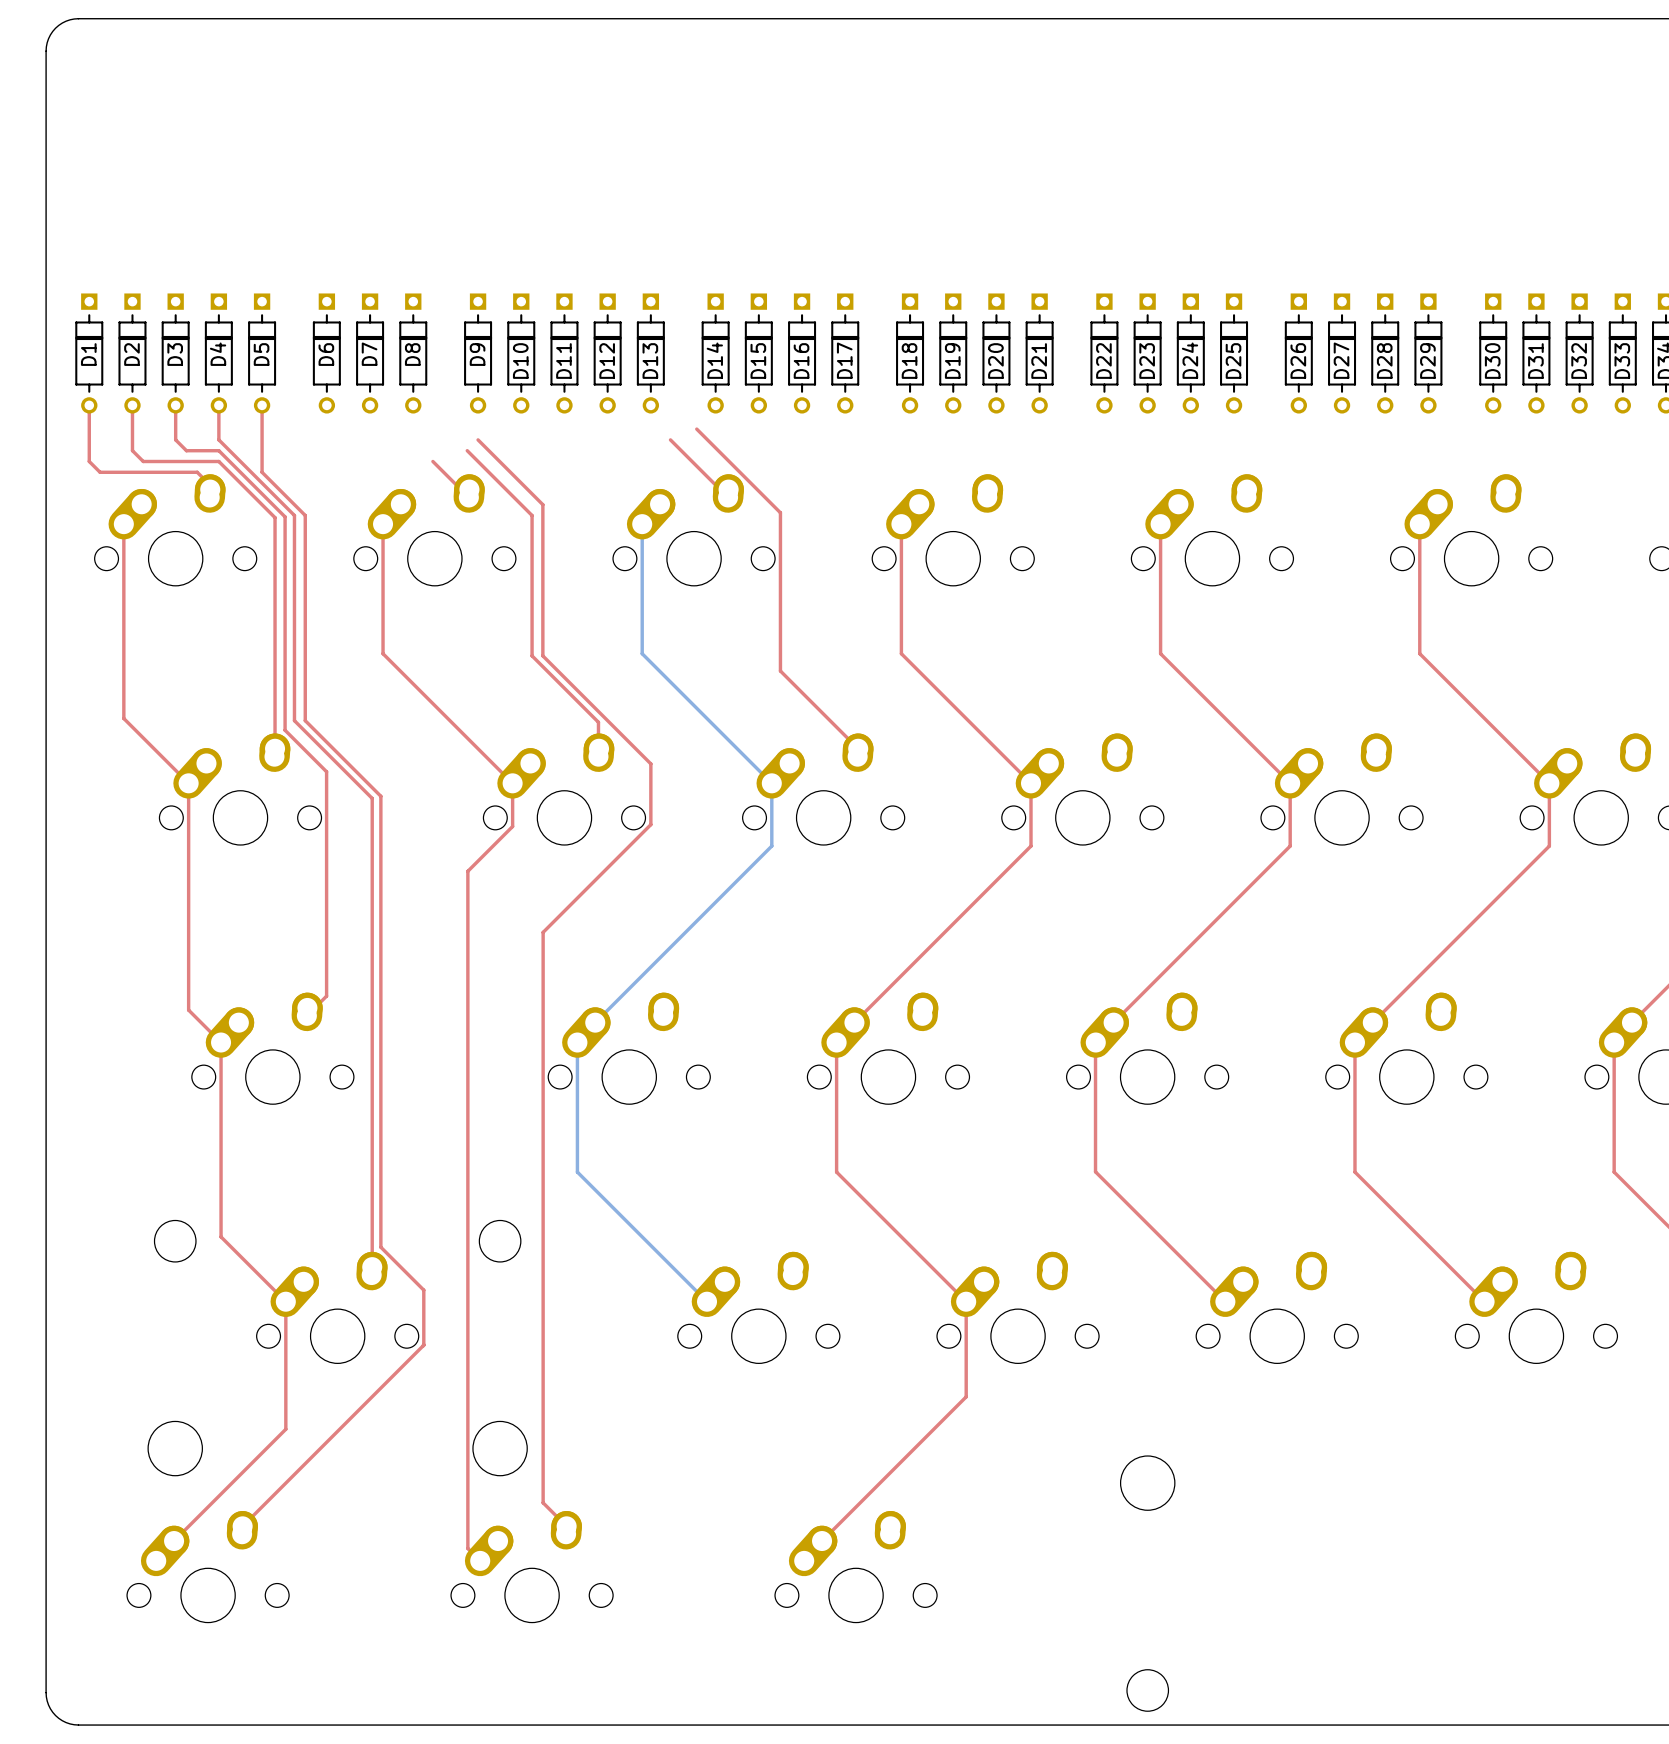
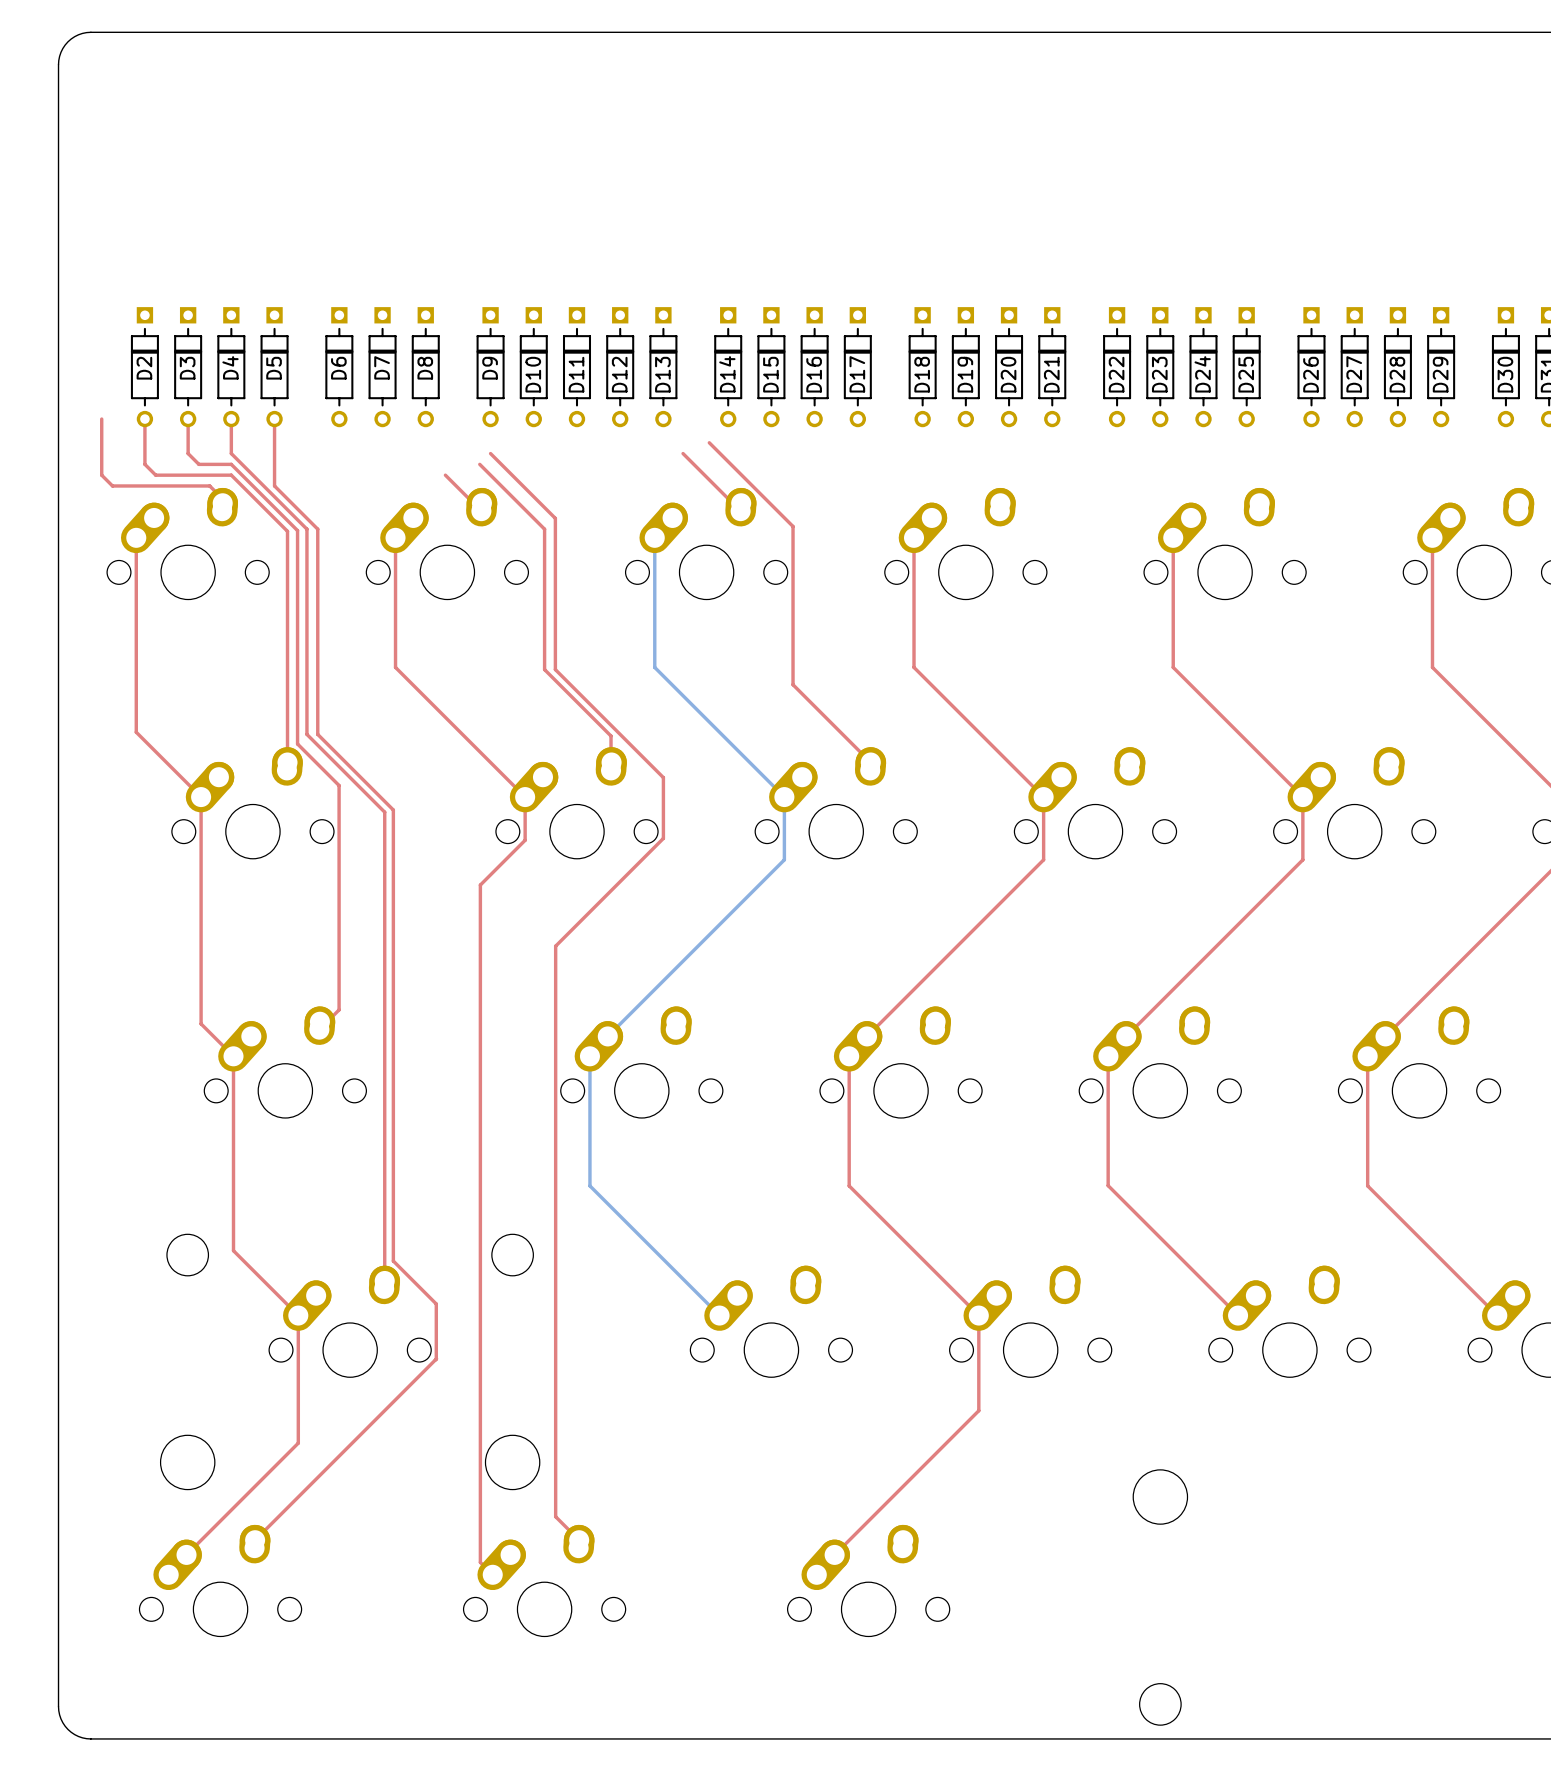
D1: (89, 353) -> none

